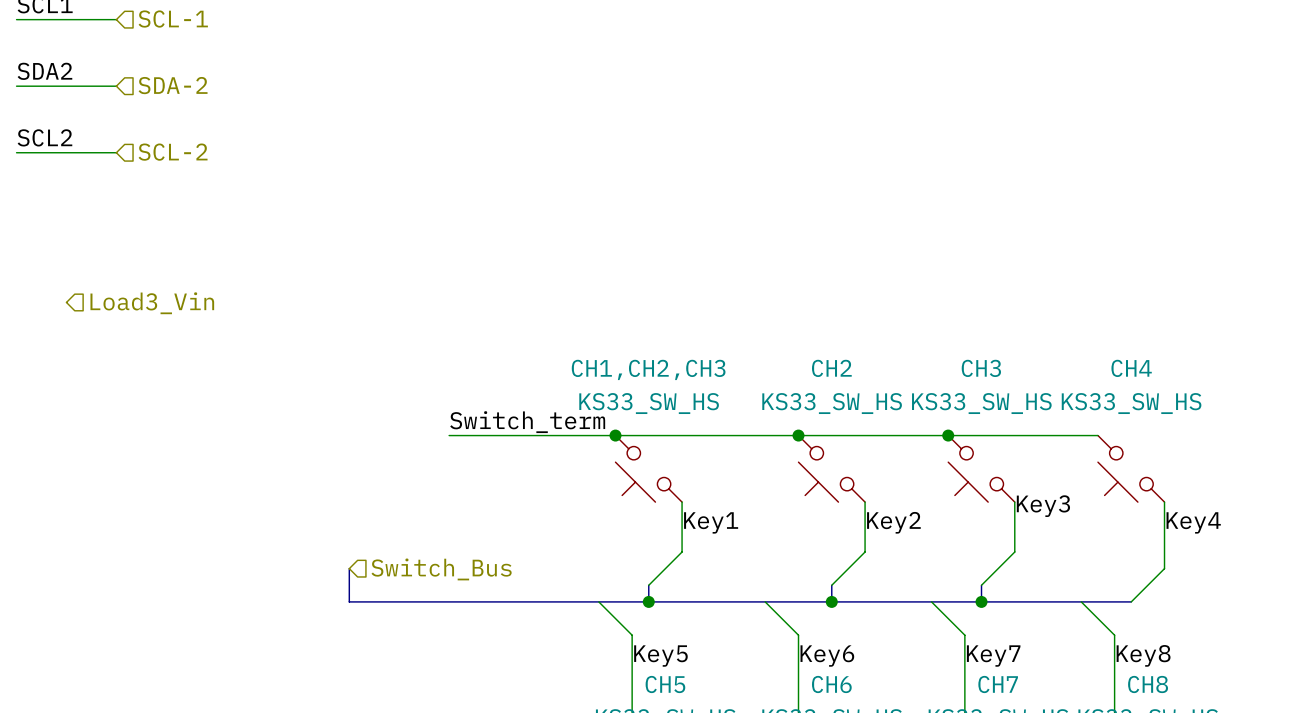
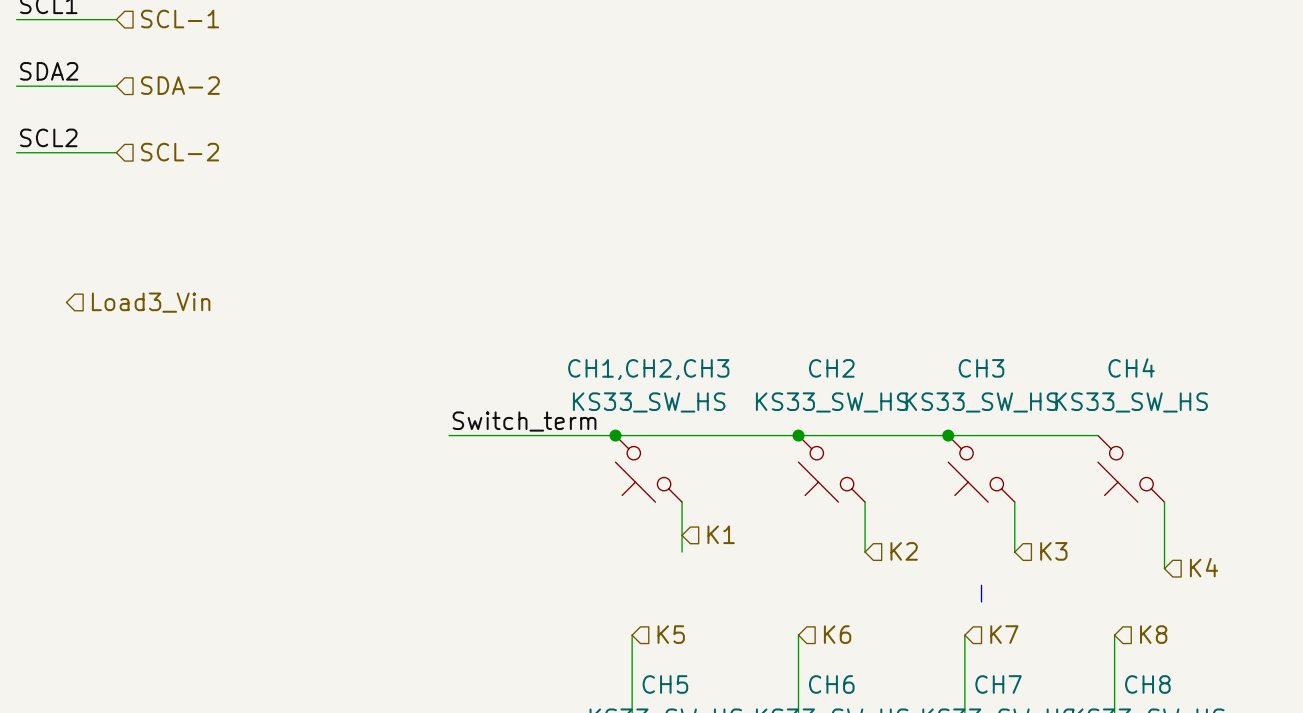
label: Key3 (1043, 506) -> none
label: Key1 (711, 522) -> none
label: Key2 (893, 522) -> none
label: Key4 (1193, 522) -> none
hierarchical label: none -> K1 (721, 534)
hierarchical label: none -> K2 (904, 551)
hierarchical label: none -> K3 (1053, 551)
wire: (682, 552) (648, 585) -> none
wire: (865, 552) (831, 585) -> none
wire: (1014, 552) (981, 585) -> none
bus: (349, 568) (349, 601) (1131, 601) -> none
wire: (1164, 568) (1131, 601) -> none
hierarchical label: none -> K4 (1203, 567)
hierarchical label: Switch_Bus (441, 569) -> none
bus: (648, 585) (648, 601) -> none
bus: (831, 585) (831, 601) -> none
wire: (598, 601) (632, 635) -> none
junction: (648, 601) -> none
wire: (765, 601) (798, 635) -> none
junction: (831, 601) -> none
wire: (931, 601) (964, 635) -> none
junction: (981, 601) -> none
wire: (1081, 601) (1114, 635) -> none
hierarchical label: none -> K5 (671, 634)
hierarchical label: none -> K6 (837, 634)
hierarchical label: none -> K7 (1004, 634)
hierarchical label: none -> K8 (1153, 634)
label: Key8 (1143, 655) -> none
label: Key5 (660, 656) -> none
label: Key6 (827, 656) -> none
label: Key7 (993, 656) -> none

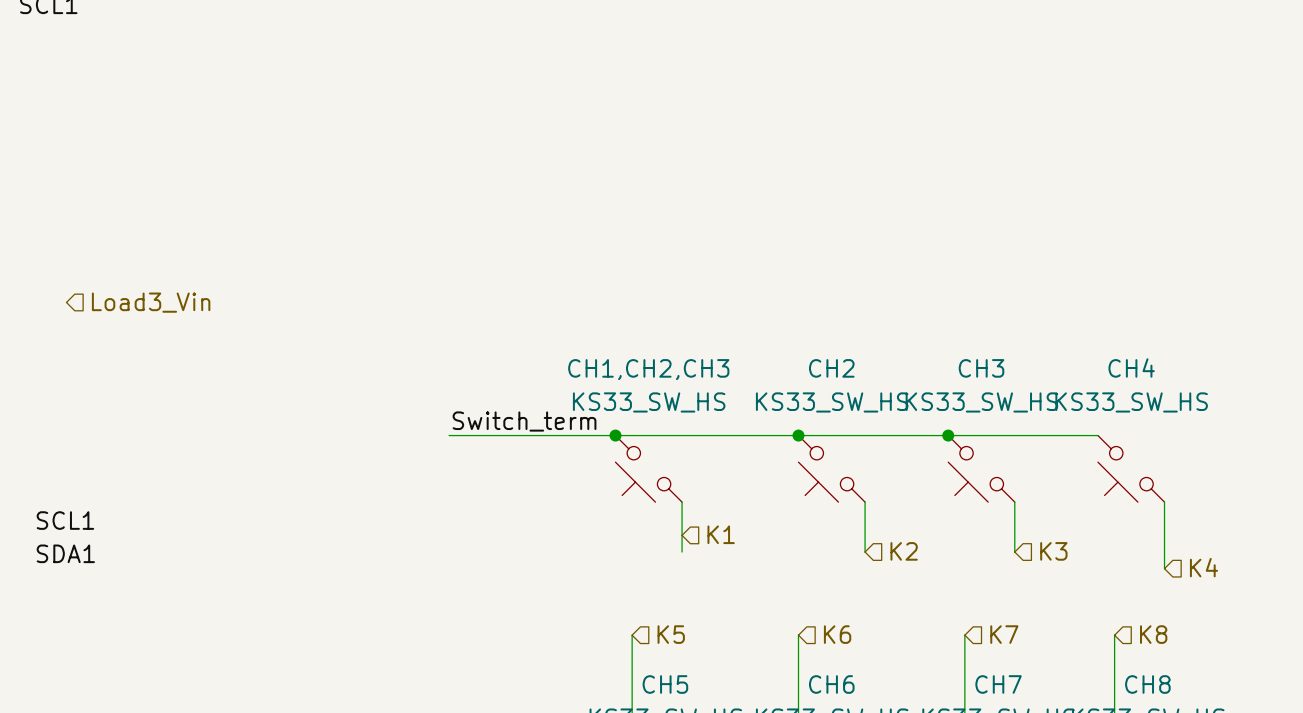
wire: (16, 19) (116, 19) -> none
hierarchical label: SCL-1 (180, 19) -> none
label: SDA2 (49, 71) -> none
hierarchical label: SDA-2 (180, 85) -> none
wire: (16, 86) (116, 86) -> none
label: SCL2 (48, 137) -> none
wire: (16, 152) (116, 152) -> none
hierarchical label: SCL-2 (180, 152) -> none
label: none -> SCL1 (65, 520)
label: none -> SDA1 (65, 553)
bus: (981, 585) (981, 601) -> none

